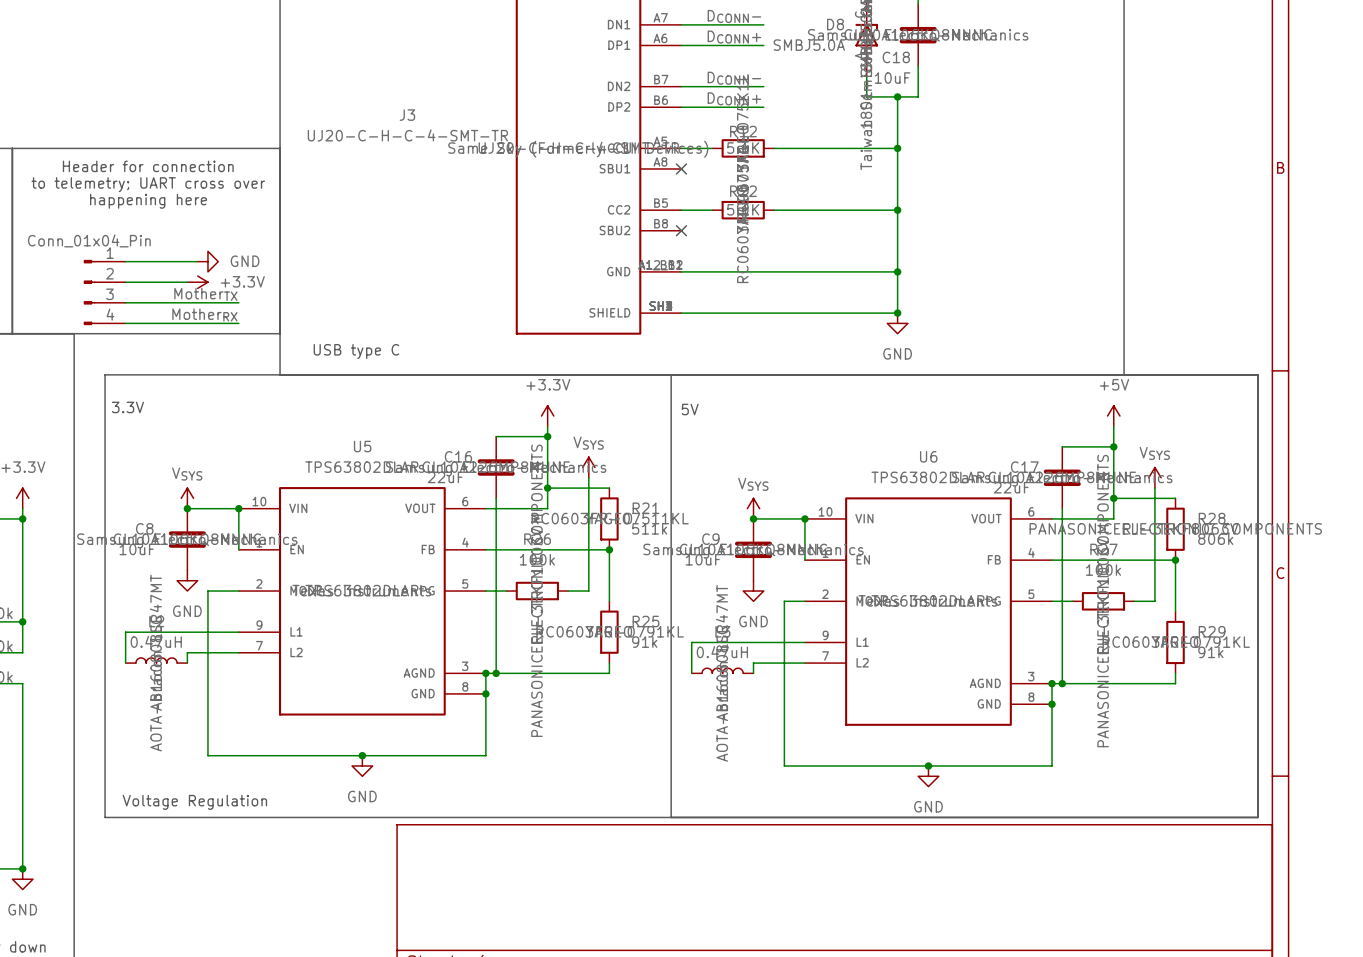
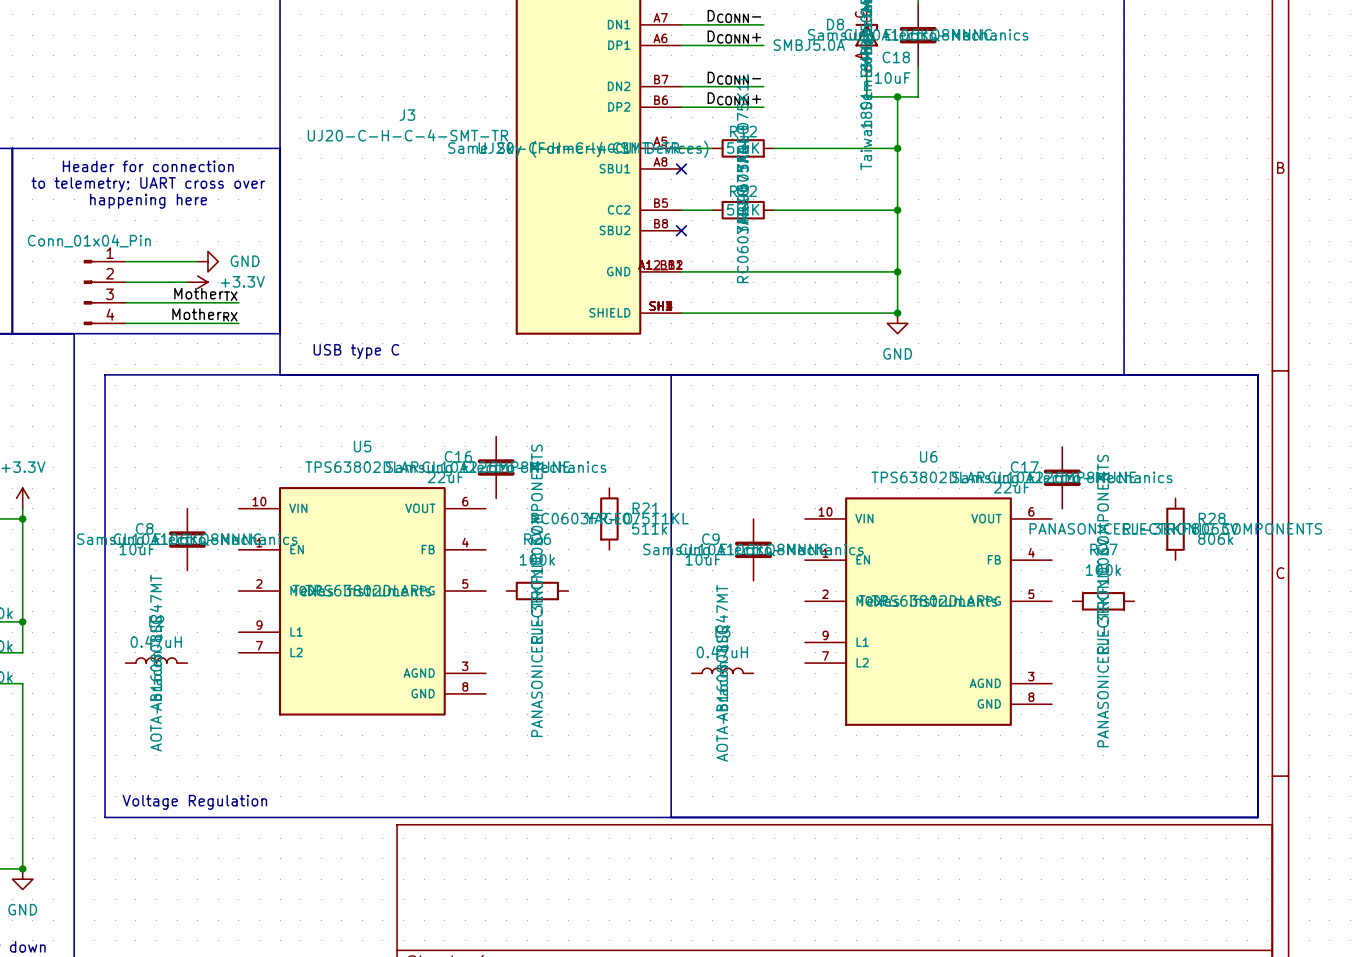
text: 3.3V (127, 407) -> none
text: 5V (690, 409) -> none
power symbol: +3.3V (547, 416) -> none
power symbol: +5V (1113, 416) -> none
wire: (547, 426) (547, 508) (485, 508) -> none
wire: (1113, 426) (1113, 518) (1052, 518) -> none
wire: (496, 436) (547, 436) -> none
junction: (547, 436) -> none
wire: (1062, 446) (1113, 446) -> none
junction: (1113, 446) -> none
power symbol: VSYS (588, 467) -> none
wire: (588, 477) (588, 591) (568, 591) -> none
power symbol: VSYS (1154, 477) -> none
wire: (547, 488) (609, 488) -> none
junction: (547, 488) -> none
wire: (1154, 488) (1154, 601) (1134, 601) -> none
power symbol: VSYS (187, 498) -> none
wire: (496, 498) (496, 673) -> none
wire: (1113, 498) (1175, 498) -> none
junction: (1113, 498) -> none
wire: (187, 508) (238, 508) (238, 549) -> none
junction: (187, 508) -> none
junction: (238, 508) -> none
power symbol: VSYS (753, 508) -> none
wire: (1062, 508) (1062, 683) -> none
wire: (753, 518) (804, 518) (804, 560) -> none
junction: (753, 518) -> none
junction: (804, 518) -> none
wire: (485, 549) (609, 549) (609, 601) -> none
junction: (609, 549) -> none
wire: (1052, 560) (1175, 560) (1175, 611) -> none
junction: (1175, 560) -> none
power symbol: GND (187, 580) -> none
wire: (238, 591) (207, 591) (207, 755) (485, 755) (485, 673) (609, 673) (609, 663) -> none
wire: (485, 591) (506, 591) -> none
power symbol: GND (753, 591) -> none
wire: (804, 601) (784, 601) (784, 765) (1052, 765) (1052, 683) (1175, 683) (1175, 673) -> none
wire: (1052, 601) (1072, 601) -> none
wire: (238, 632) (125, 632) (125, 663) -> none
R25: 91k (609, 632) -> none
wire: (804, 642) (691, 642) (691, 673) -> none
R29: 91k (1175, 642) -> none
wire: (238, 652) (187, 652) (187, 663) -> none
wire: (804, 663) (753, 663) (753, 673) -> none
junction: (485, 673) -> none
junction: (496, 673) -> none
junction: (1052, 683) -> none
junction: (1062, 683) -> none
junction: (485, 693) -> none
junction: (1052, 704) -> none
junction: (362, 755) -> none
power symbol: GND (362, 765) -> none
junction: (928, 765) -> none
power symbol: GND (928, 776) -> none

